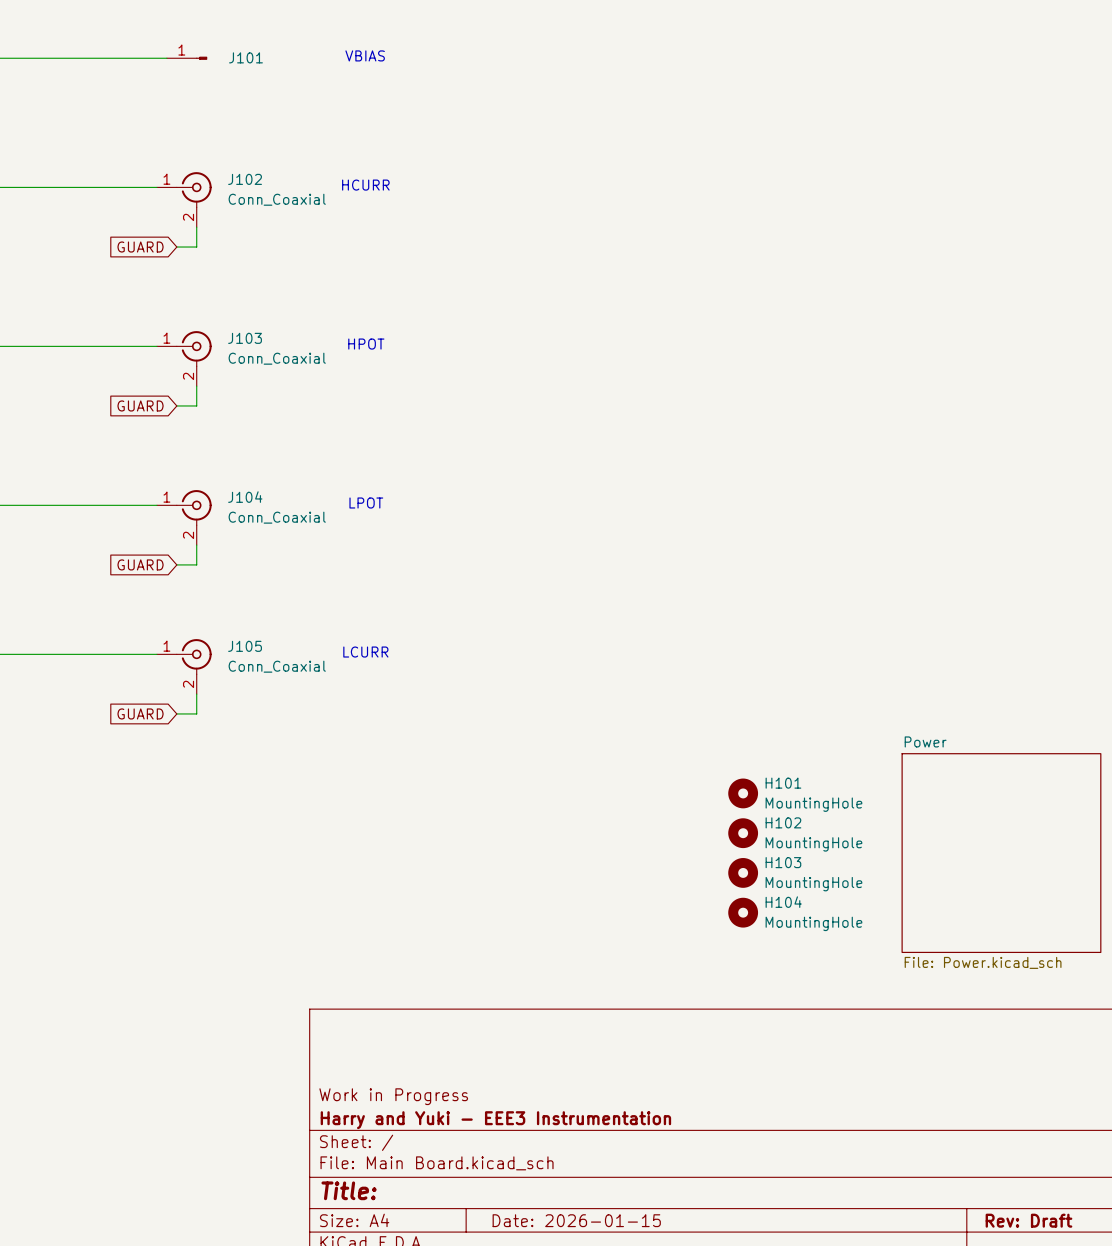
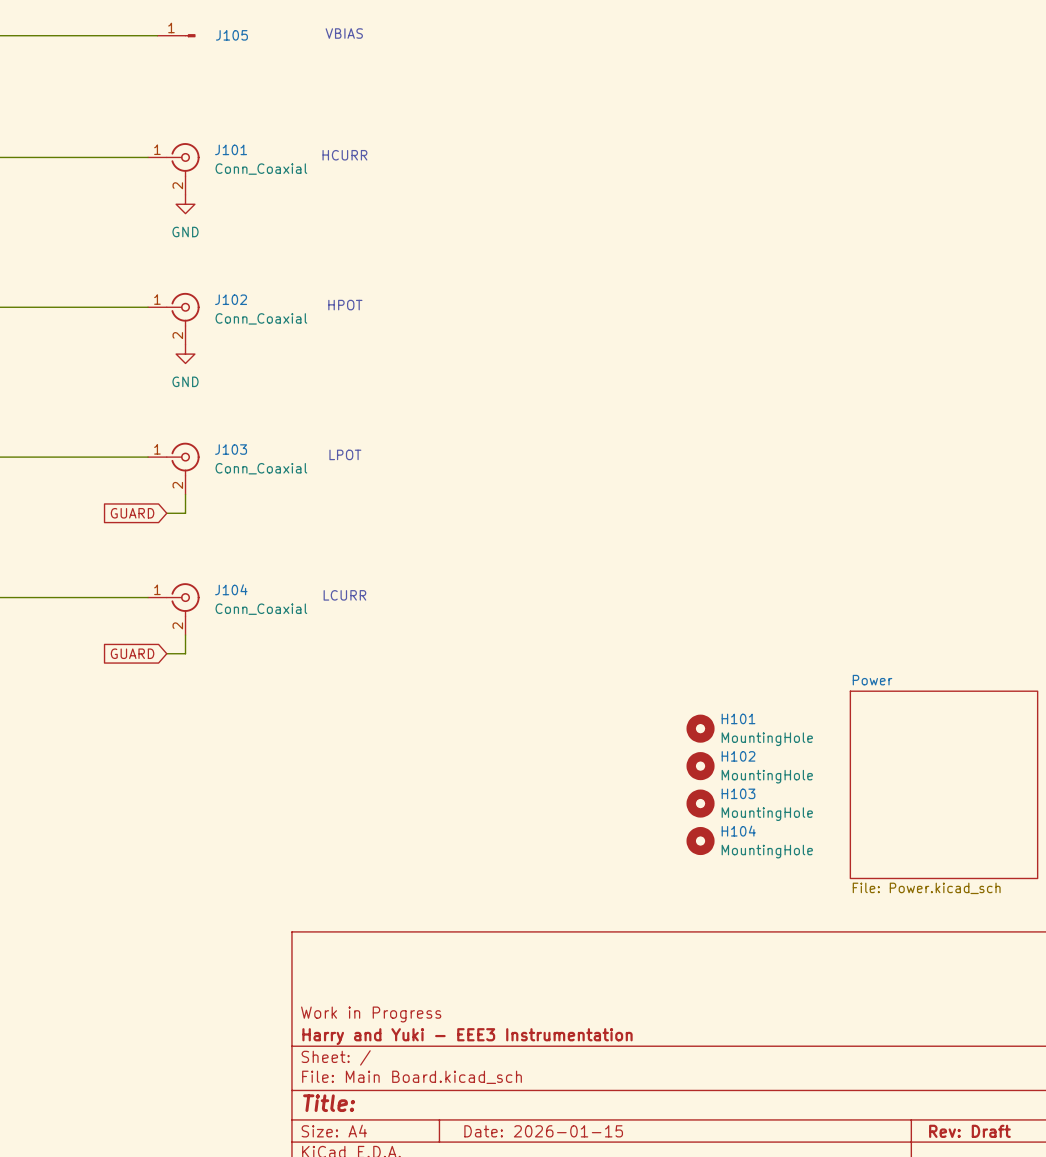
J101 name: J101 (245, 57) -> J105 (231, 35)
J102 name: J102 (245, 179) -> J101 (231, 149)
wire: (196, 227) (196, 247) (176, 247) -> none
power symbol: none -> GND (185, 204)
global label: GUARD (140, 247) -> none
J103 name: J103 (245, 338) -> J102 (231, 299)
wire: (196, 386) (196, 405) (176, 405) -> none
power symbol: none -> GND (185, 354)
global label: GUARD (140, 405) -> none
J104 name: J104 (245, 497) -> J103 (231, 449)
J105 name: J105 (245, 646) -> J104 (231, 589)

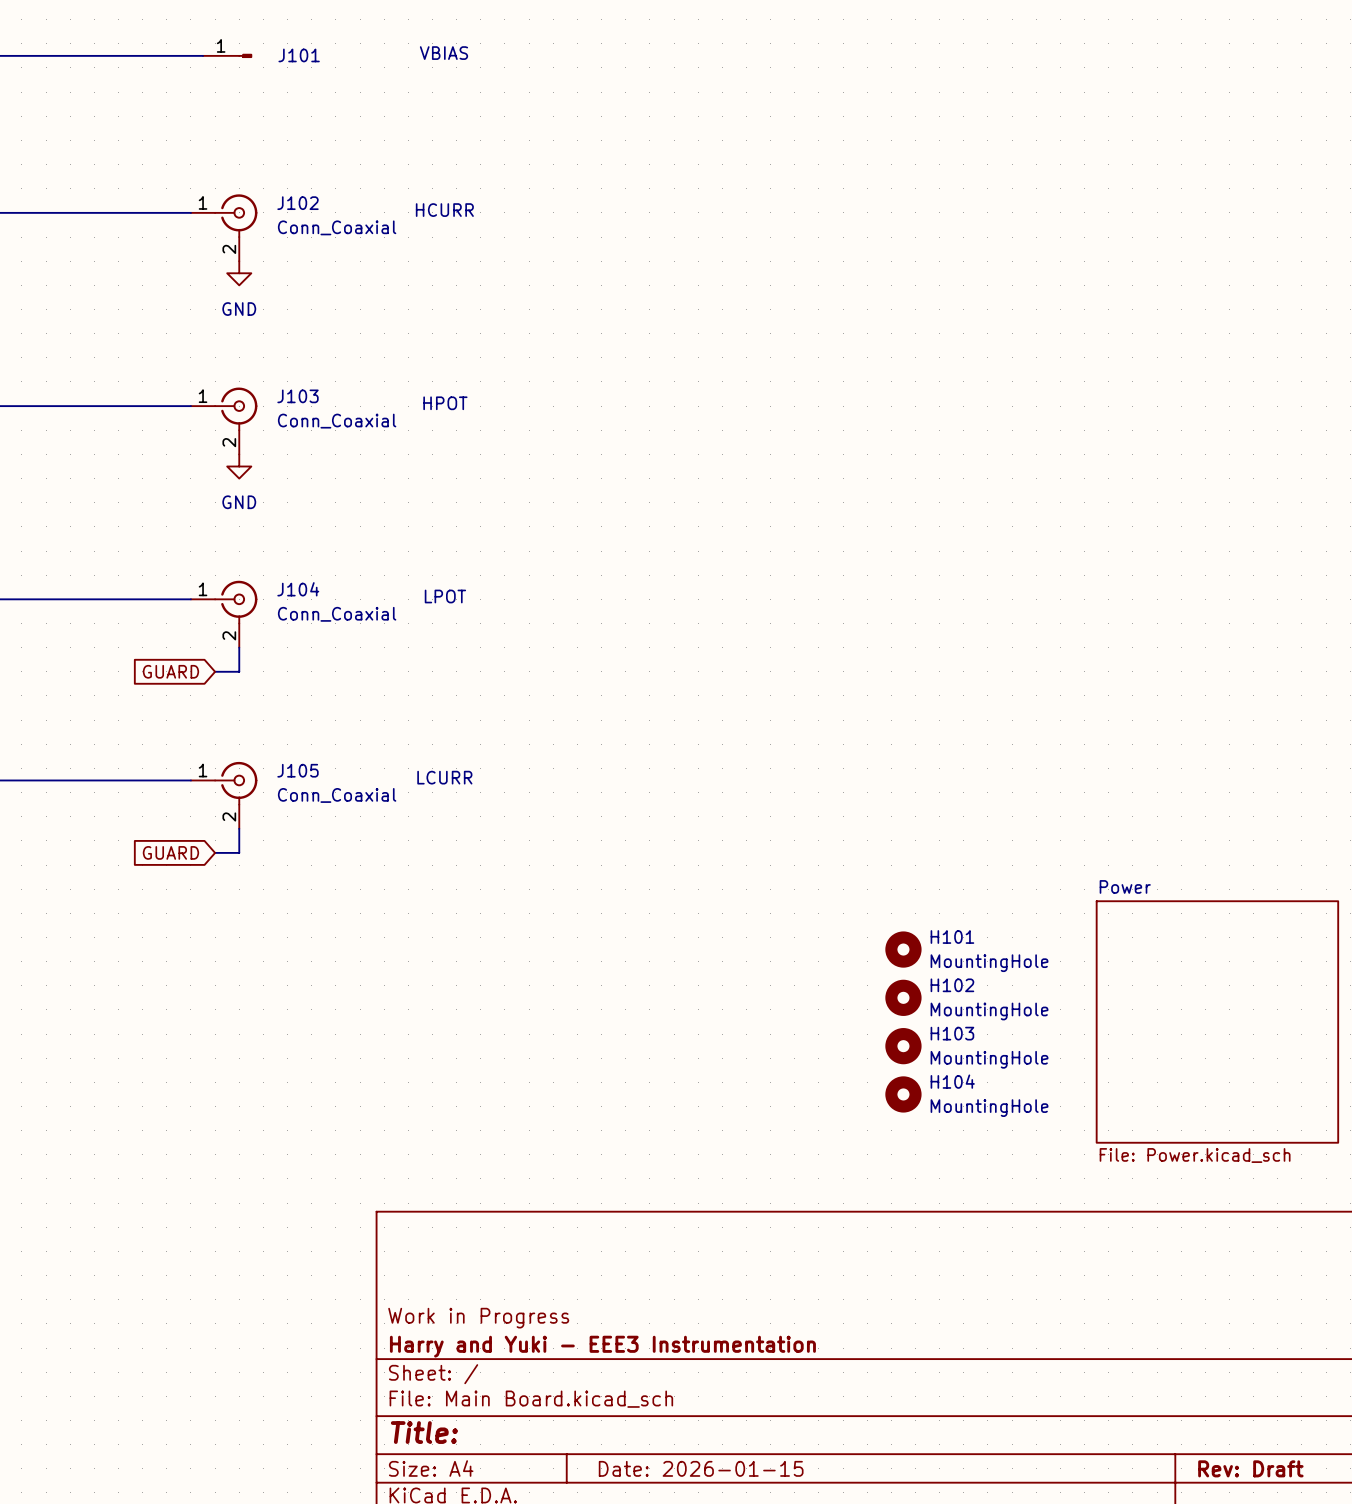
J105 name: J105 (231, 35) -> J101 (299, 55)
J101 name: J101 (231, 149) -> J102 (298, 203)
J102 name: J102 (231, 299) -> J103 (298, 396)
J103 name: J103 (231, 449) -> J104 (298, 589)
J104 name: J104 (231, 589) -> J105 (298, 770)

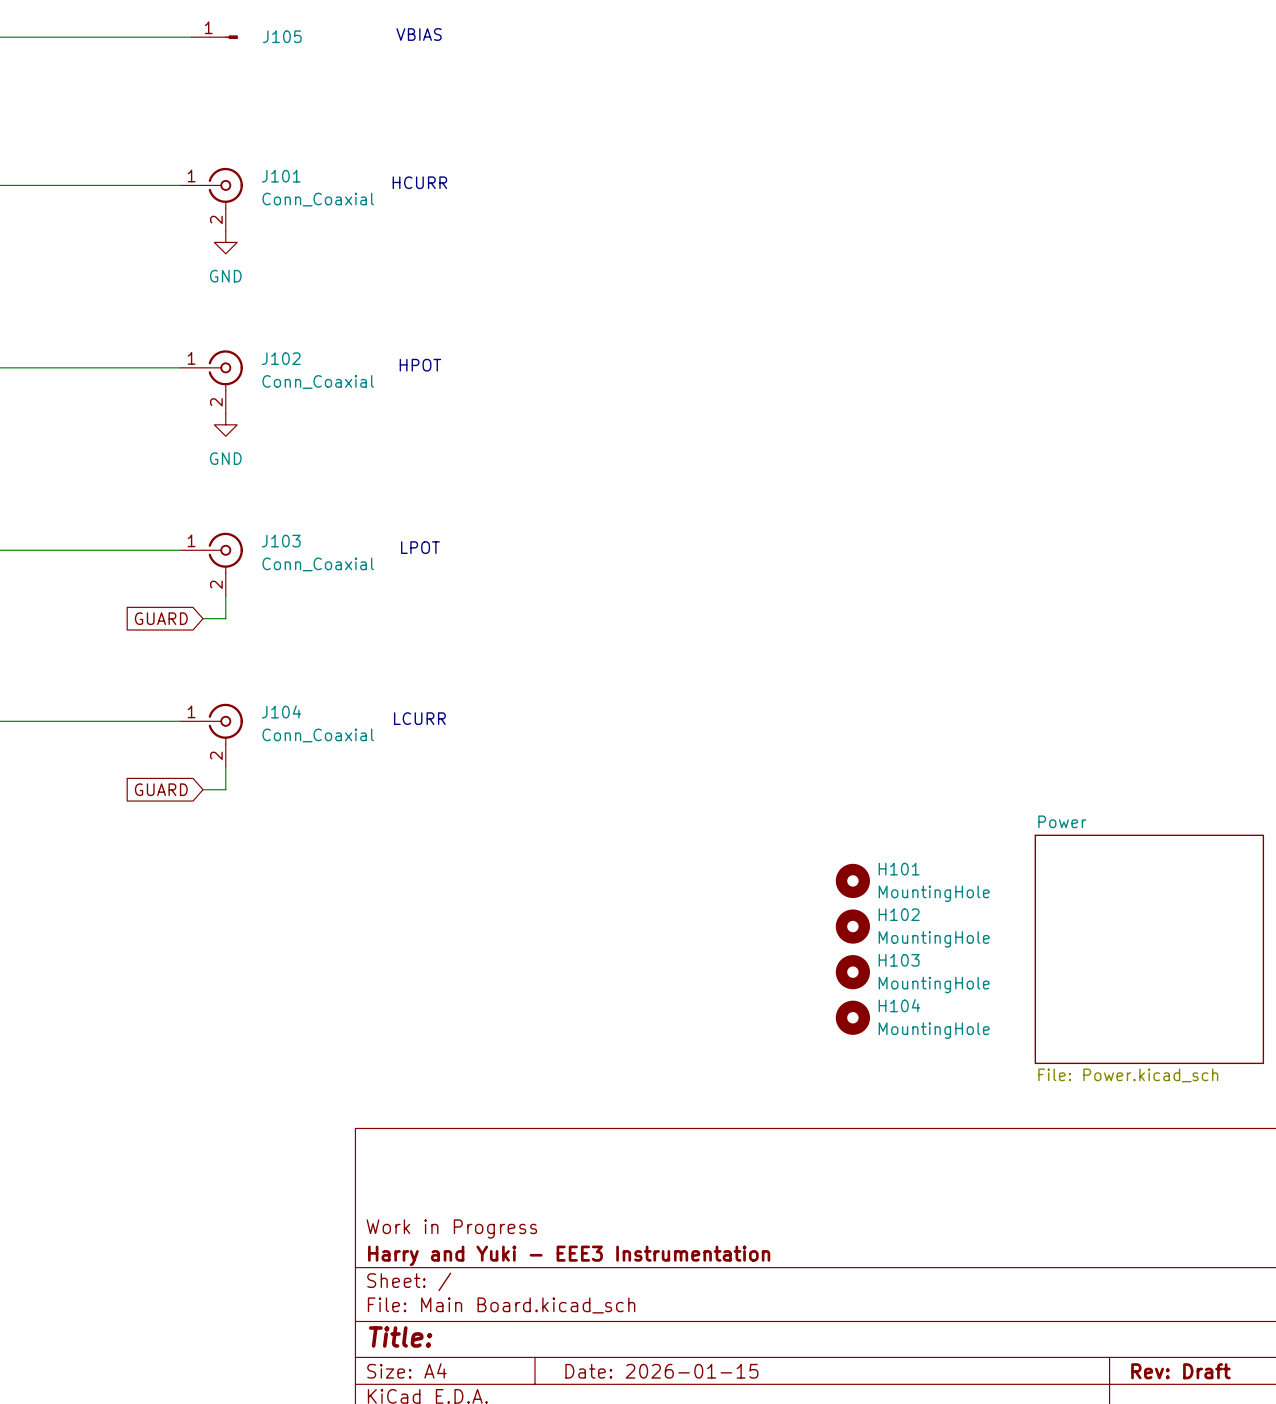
J101 name: J101 (299, 55) -> J105 (282, 36)
J102 name: J102 (298, 203) -> J101 (281, 176)
J103 name: J103 (298, 396) -> J102 (281, 358)
J104 name: J104 (298, 589) -> J103 (281, 541)
J105 name: J105 (298, 770) -> J104 (281, 711)

